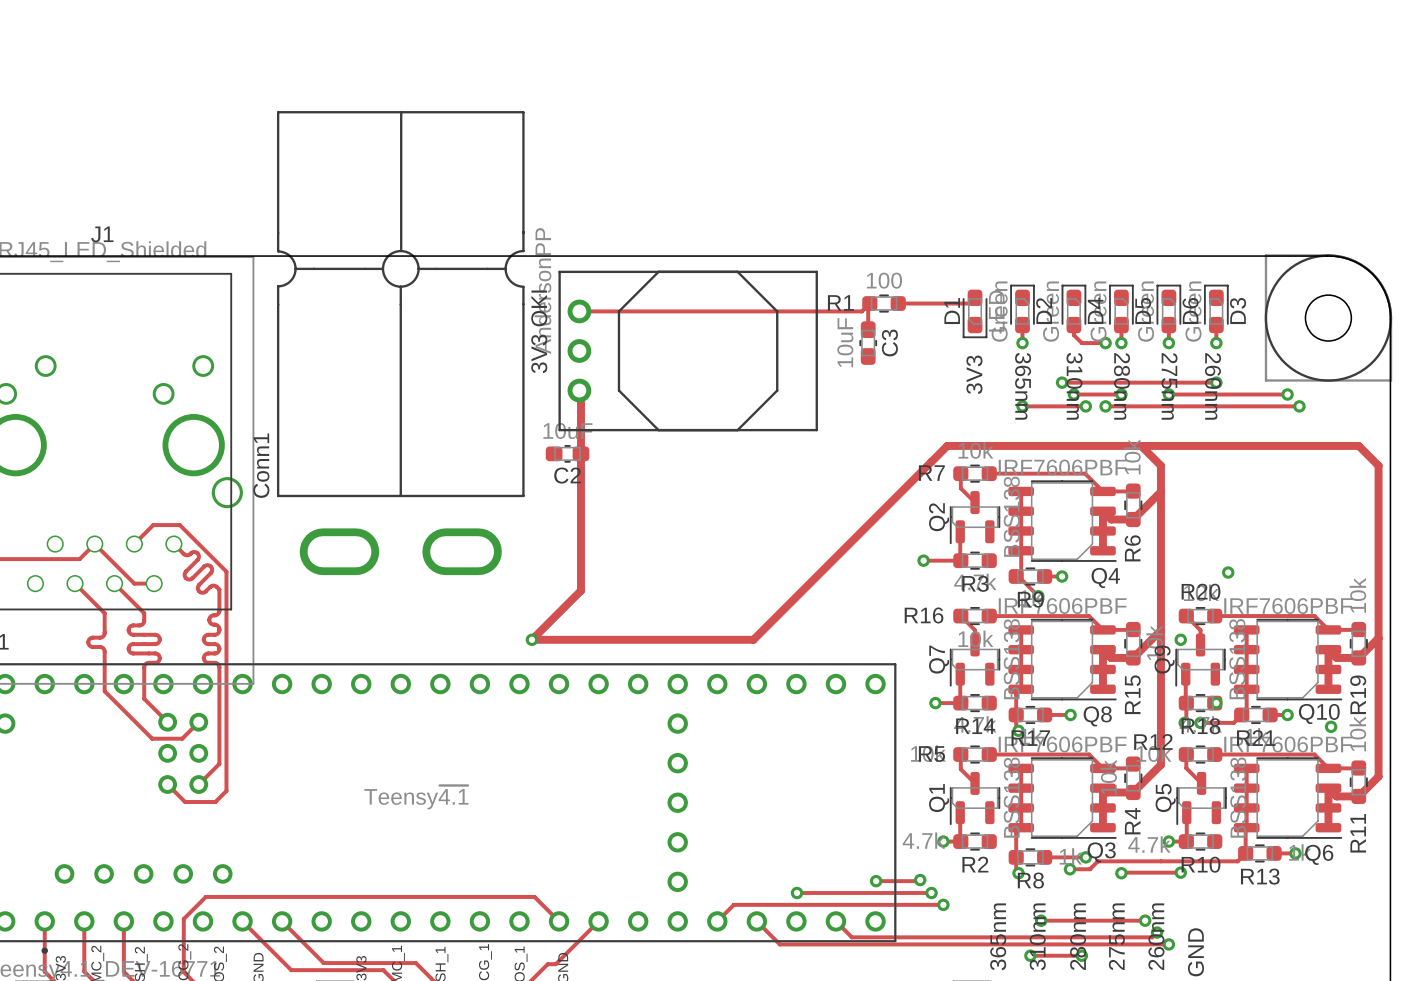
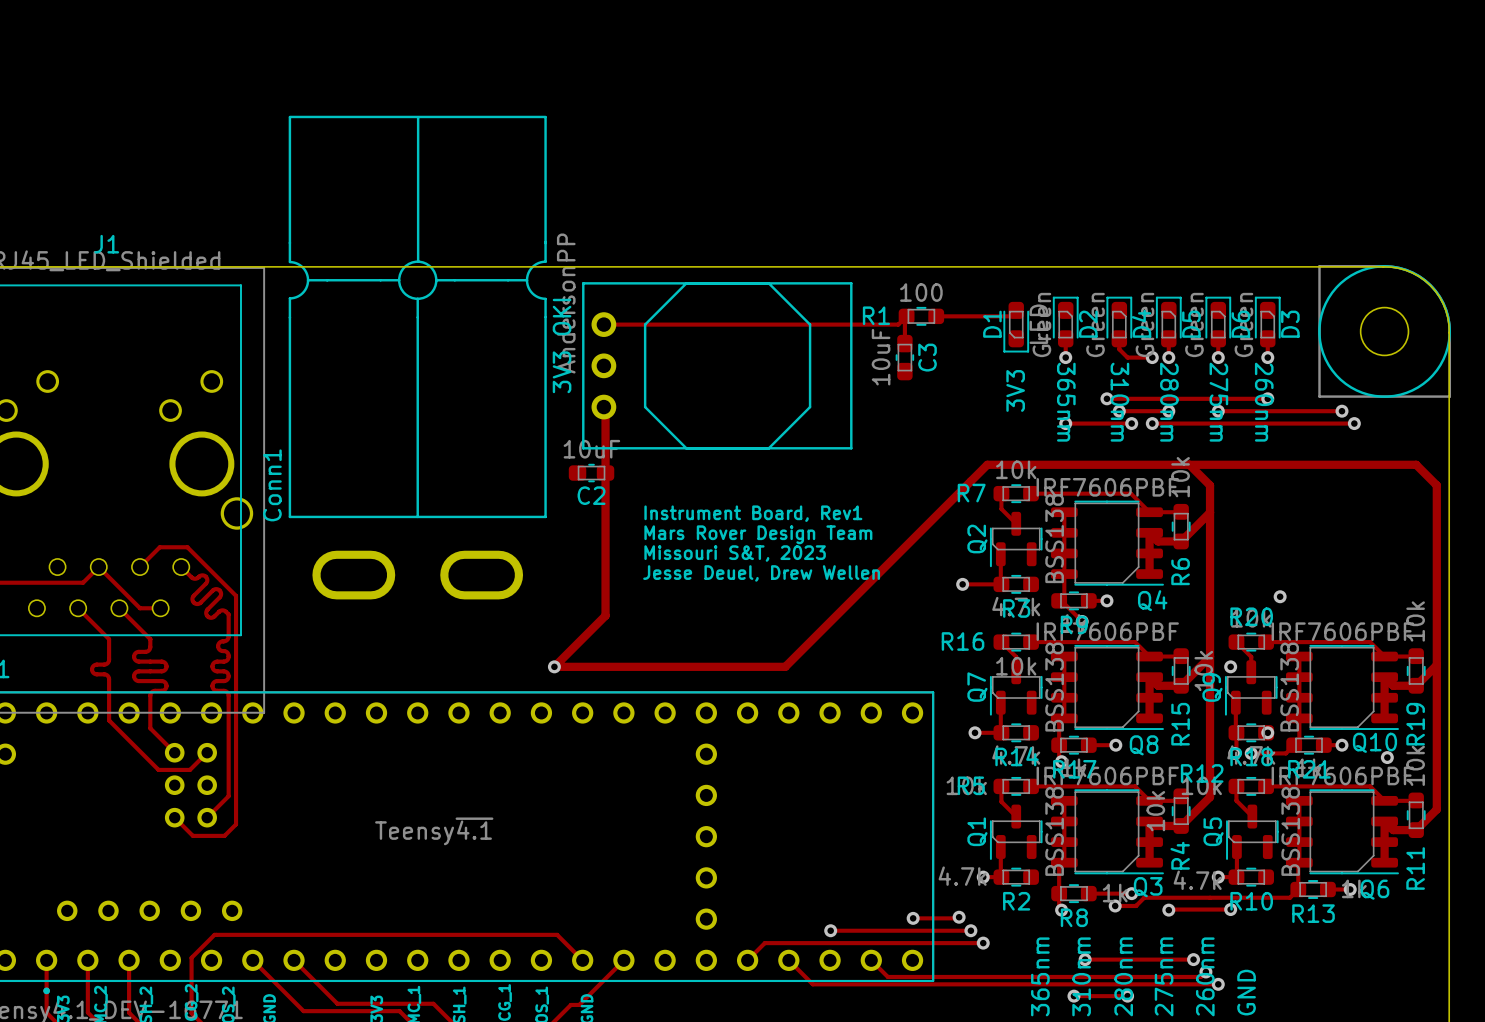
text: none -> Instrument Board, Rev1 (753, 513)
text: none -> Mars Rover Design Team (758, 534)
text: none -> Missouri S&T, 2023 (735, 553)
text: none -> Jesse Deuel, Drew Wellen (761, 573)

